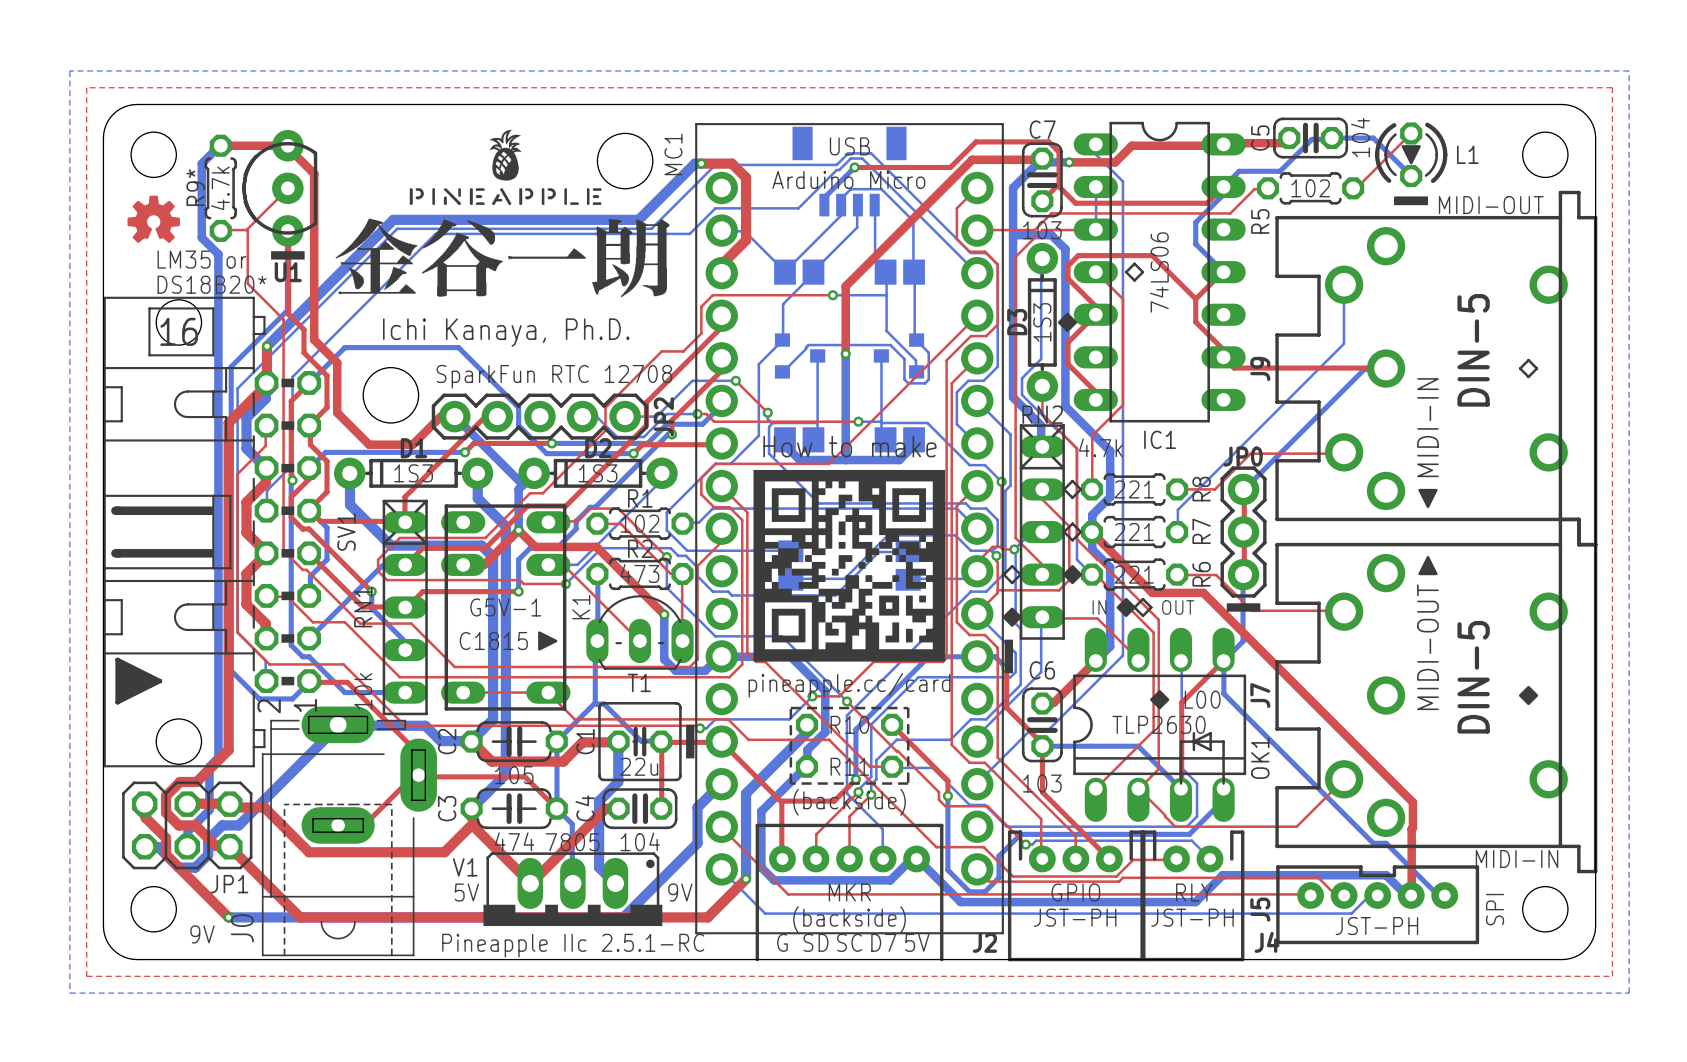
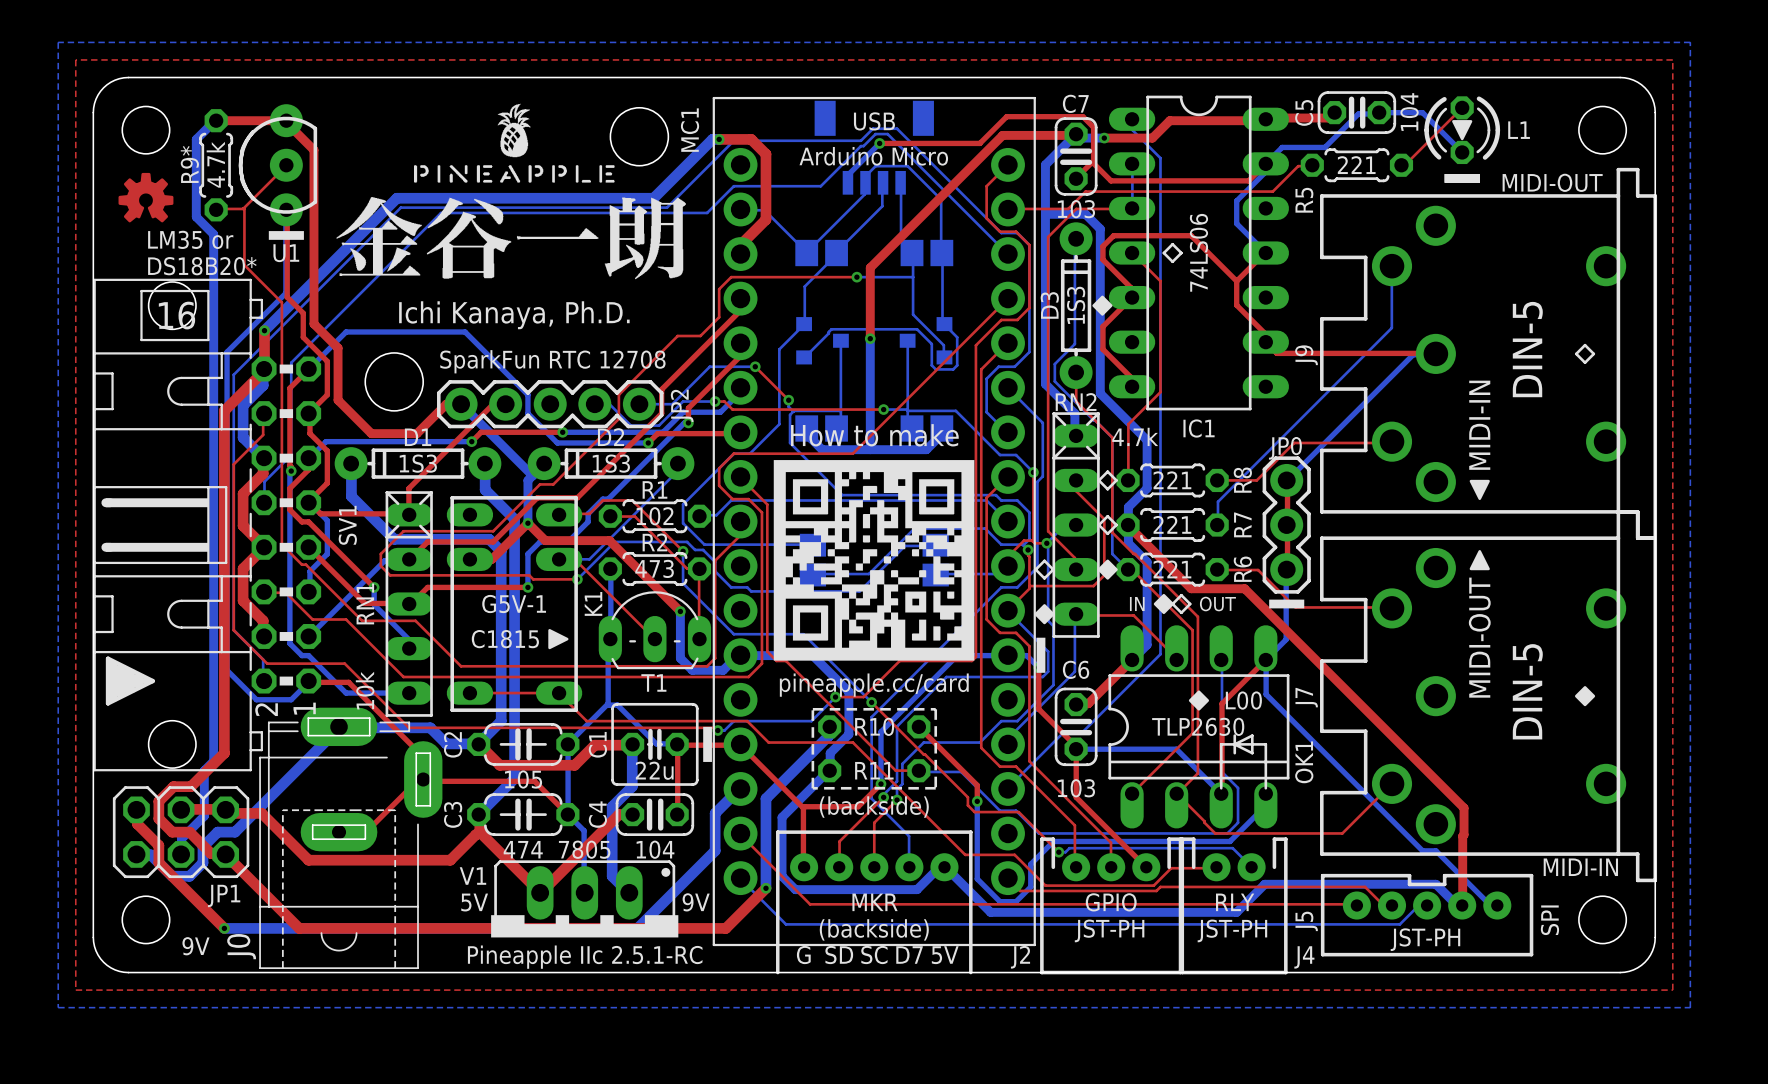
text: 102 (1310, 188) -> 221 (1356, 165)

